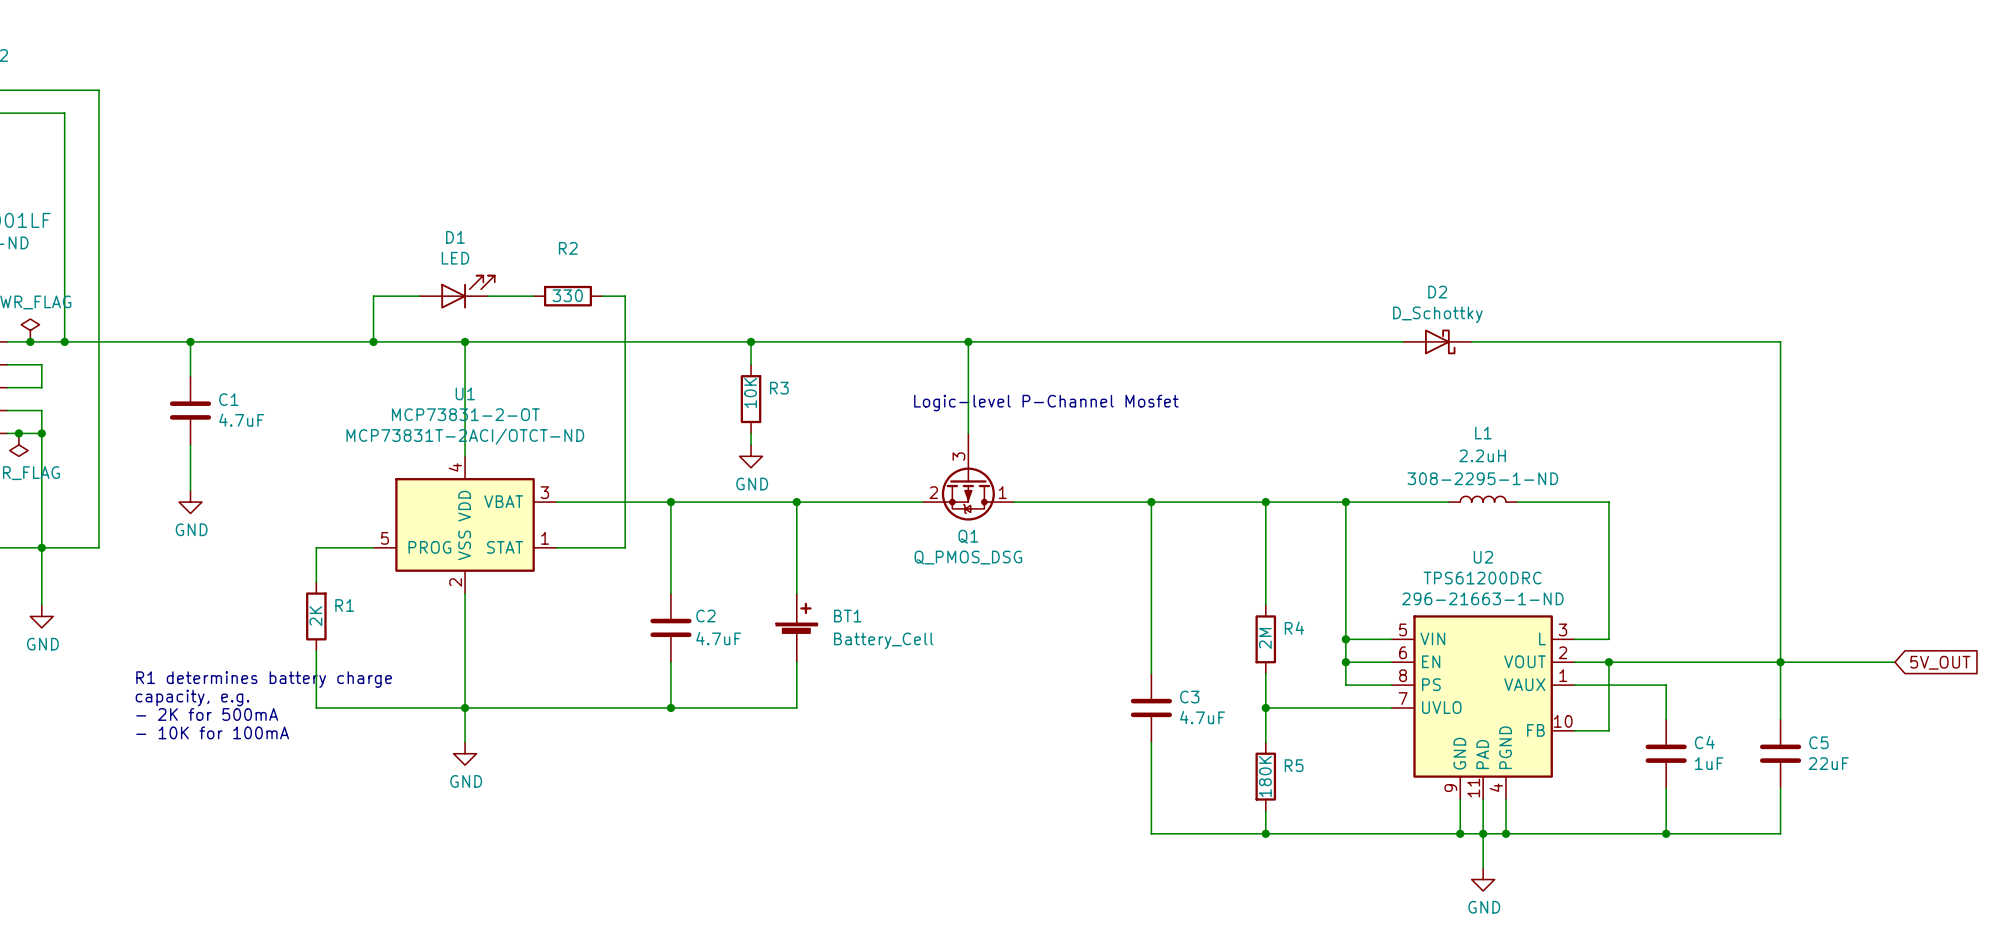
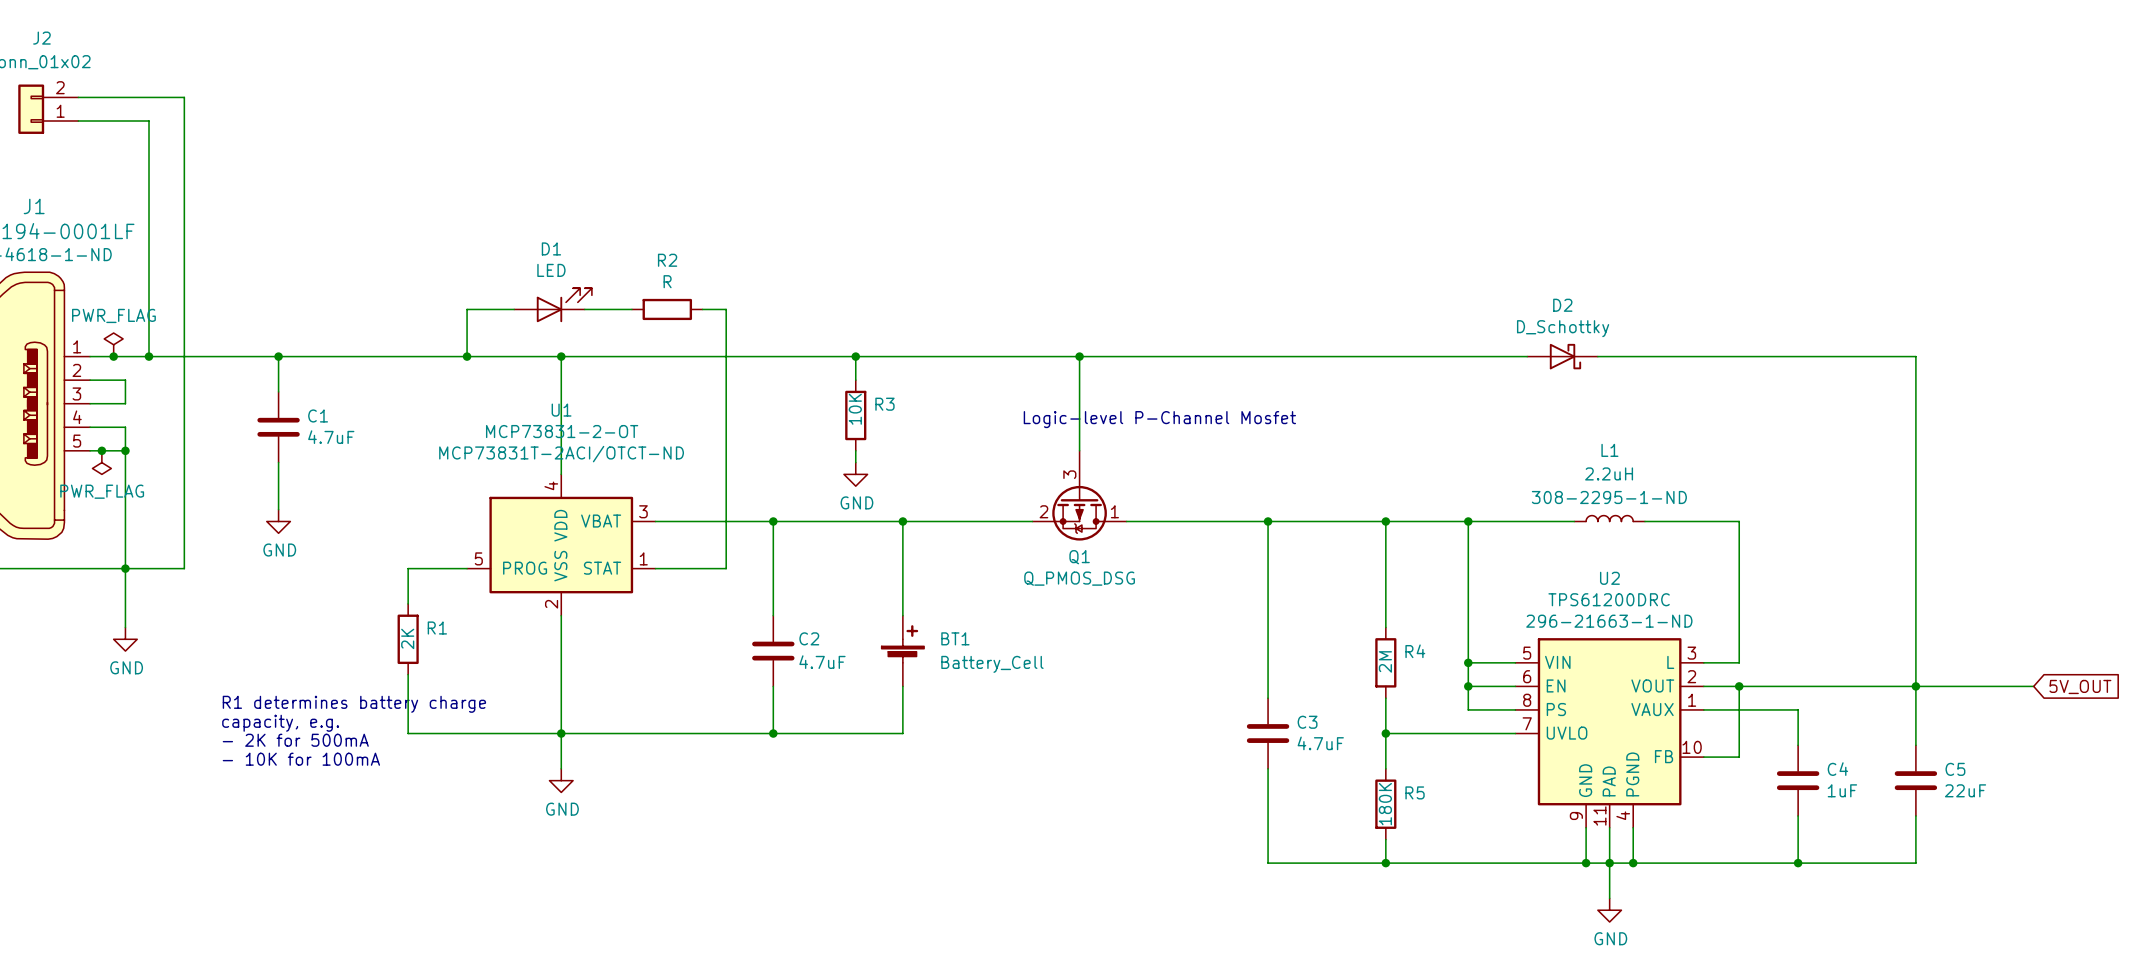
R2 value: 330 (567, 295) -> R (667, 281)

